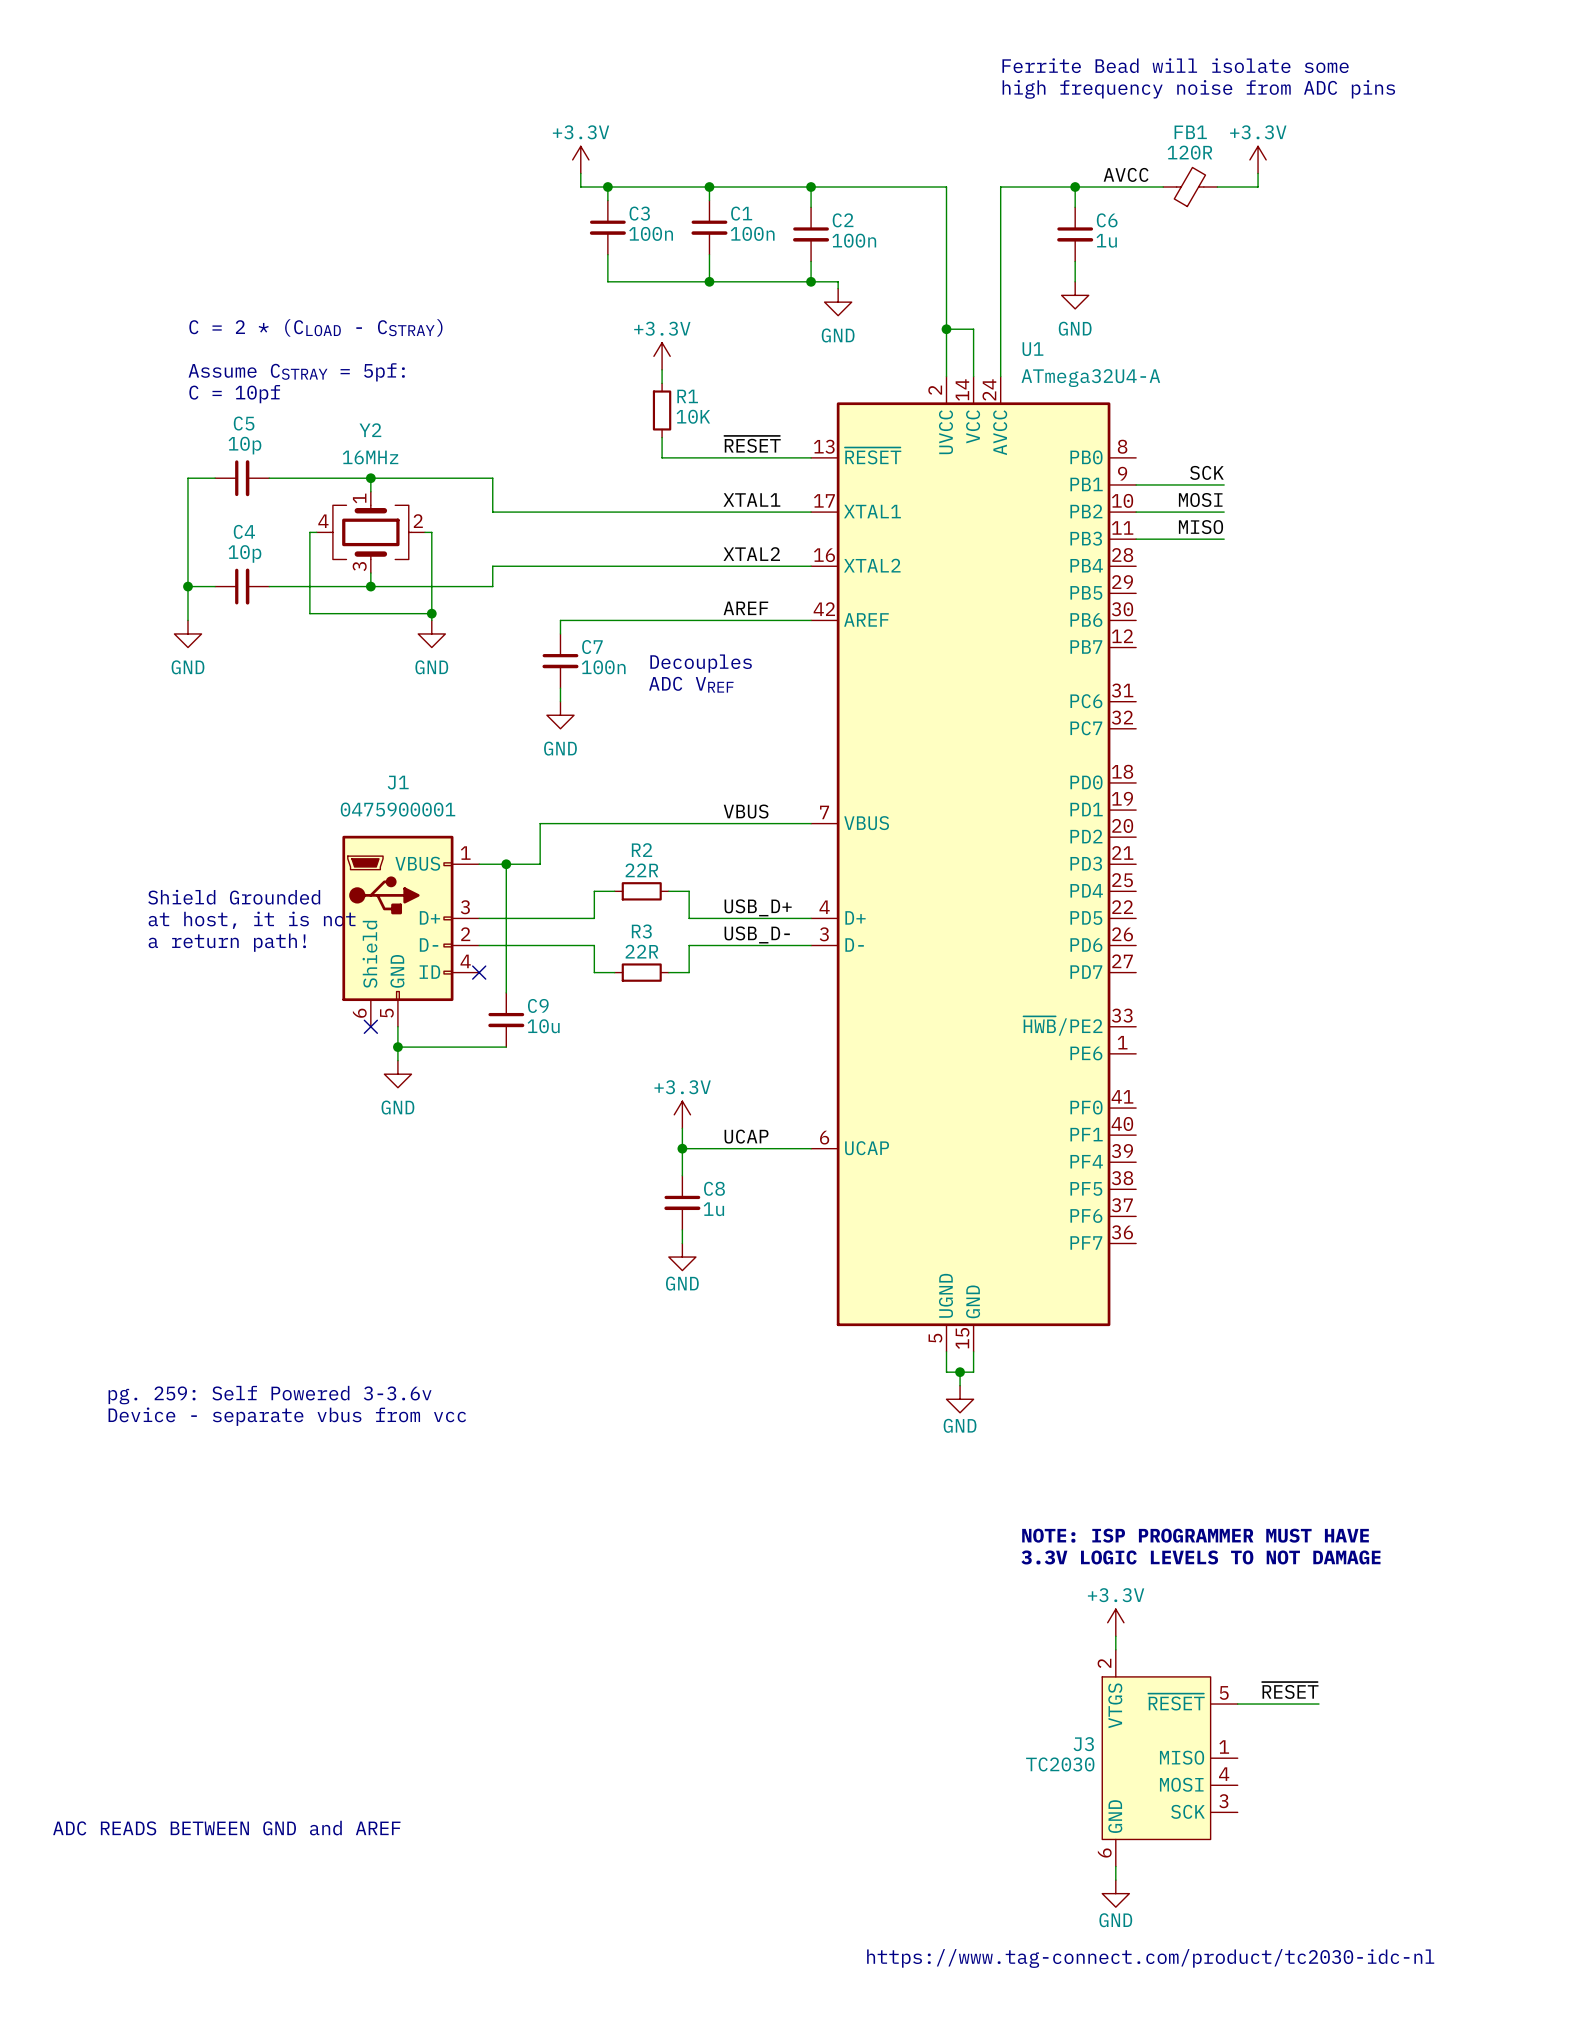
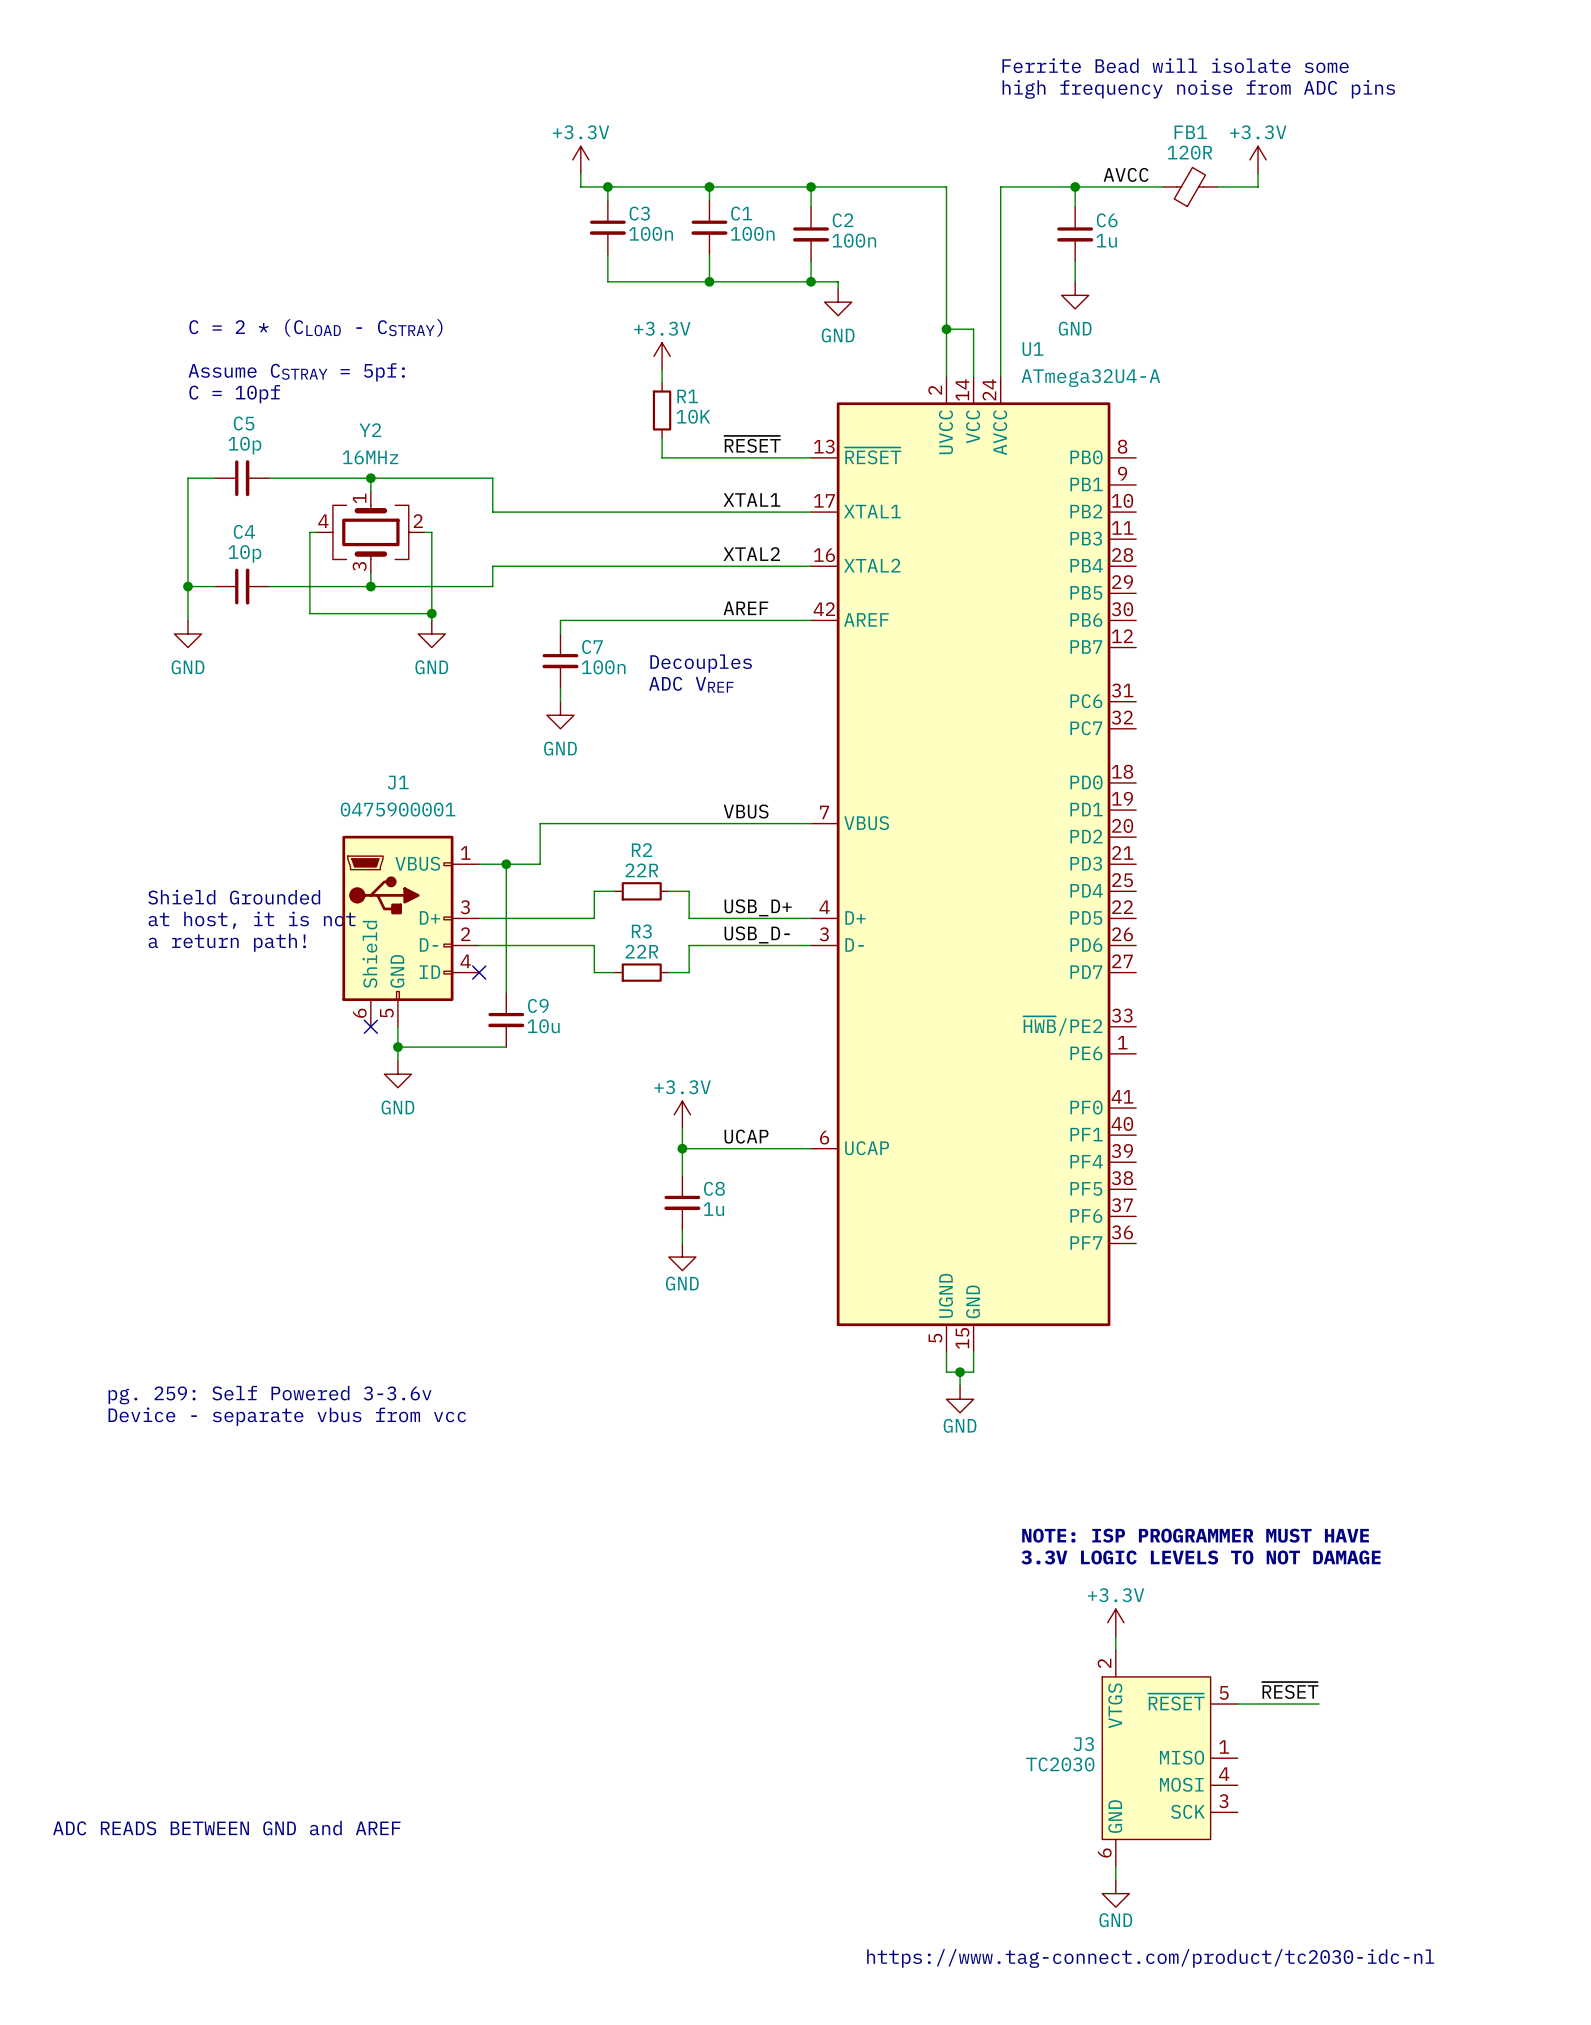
label: SCK (1206, 472) -> none
wire: (1136, 484) (1224, 484) -> none
label: MOSI (1200, 499) -> none
wire: (1136, 512) (1224, 512) -> none
label: MISO (1200, 527) -> none
wire: (1136, 539) (1224, 539) -> none

